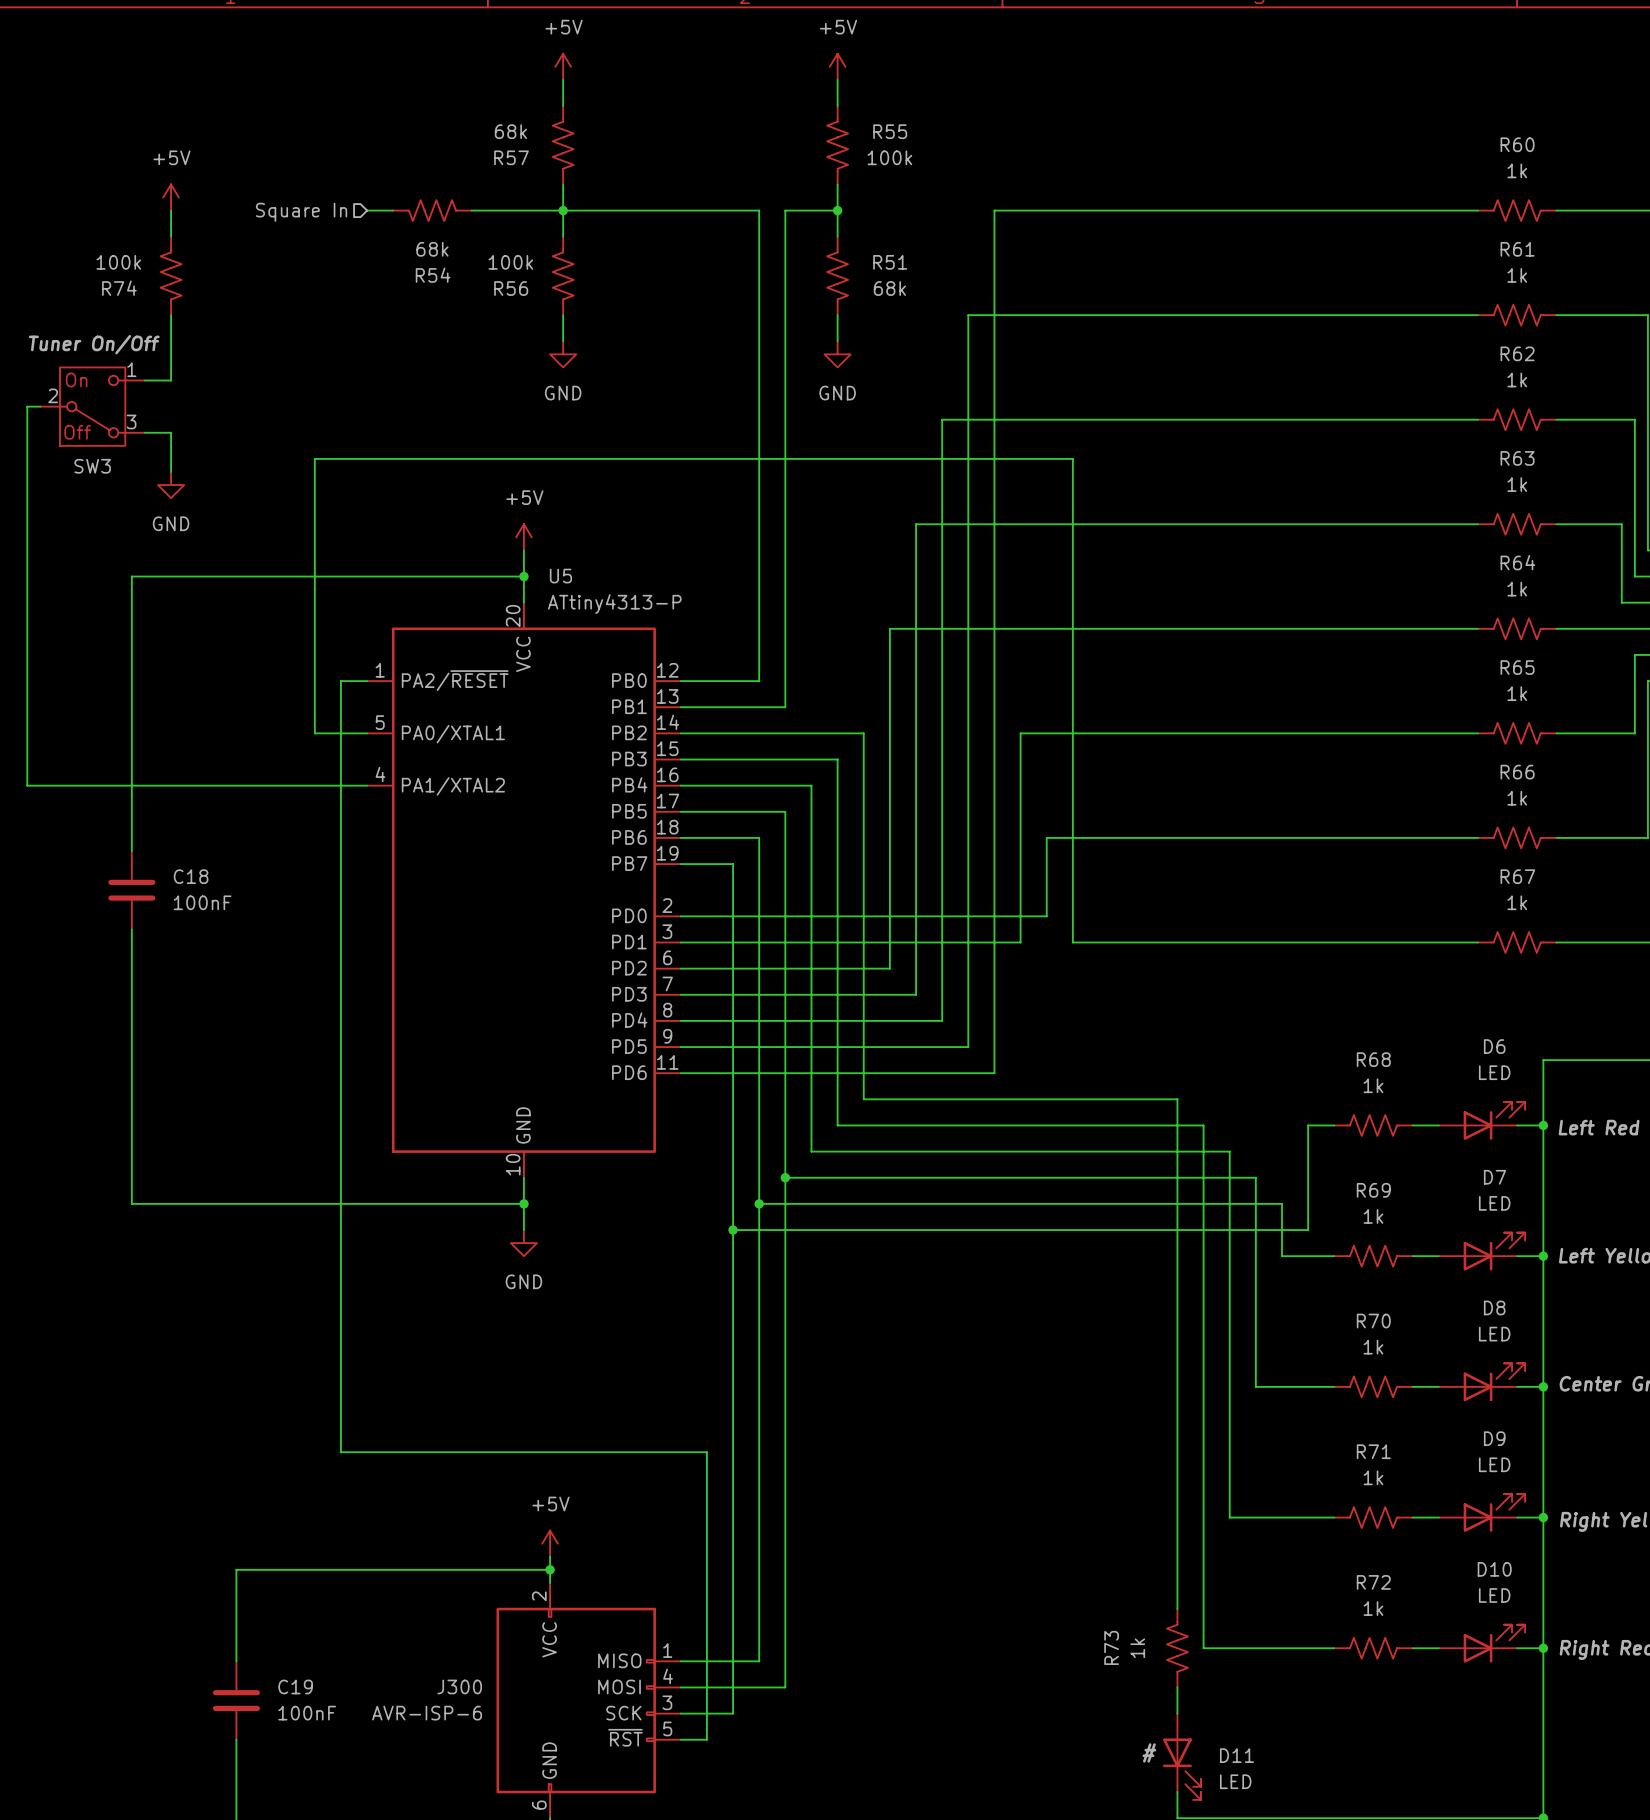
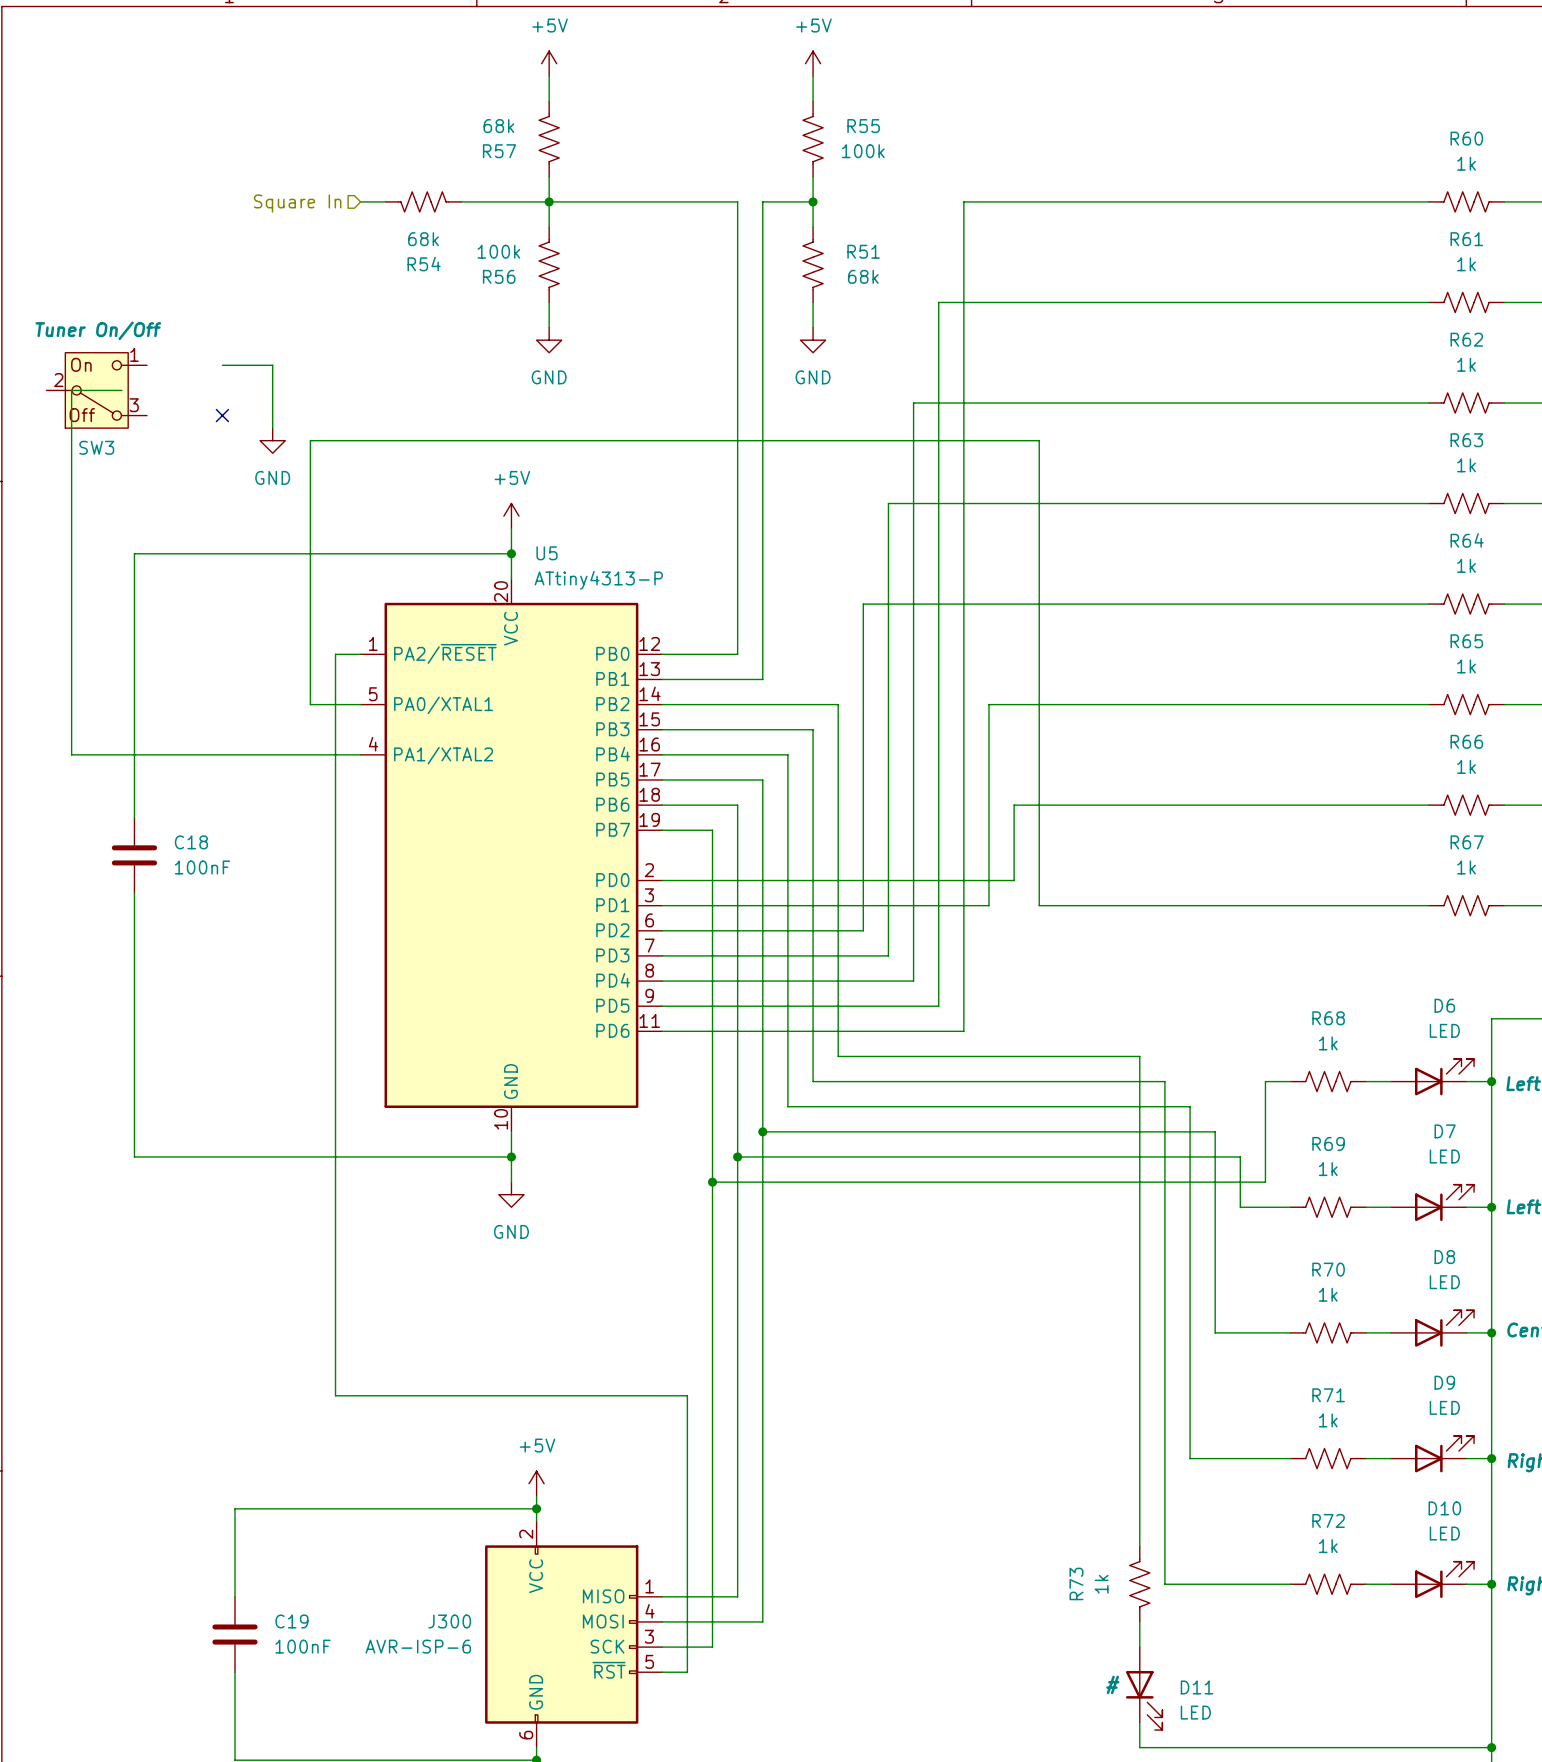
power symbol: +5V (171, 197) -> none
wire: (171, 210) (171, 236) -> none
R74: 100k (171, 275) -> none
wire: (171, 315) (171, 380) (144, 380) -> none
wire: none -> (222, 365) (272, 365) (272, 428)
wire: (40, 406) (27, 406) (27, 785) (66, 785) -> (121, 390) (71, 390) (71, 754)
wire: (144, 432) (171, 432) (171, 471) -> none
no-connect mark: none -> (222, 415)
power symbol position: GND (171, 485) -> GND (272, 440)

